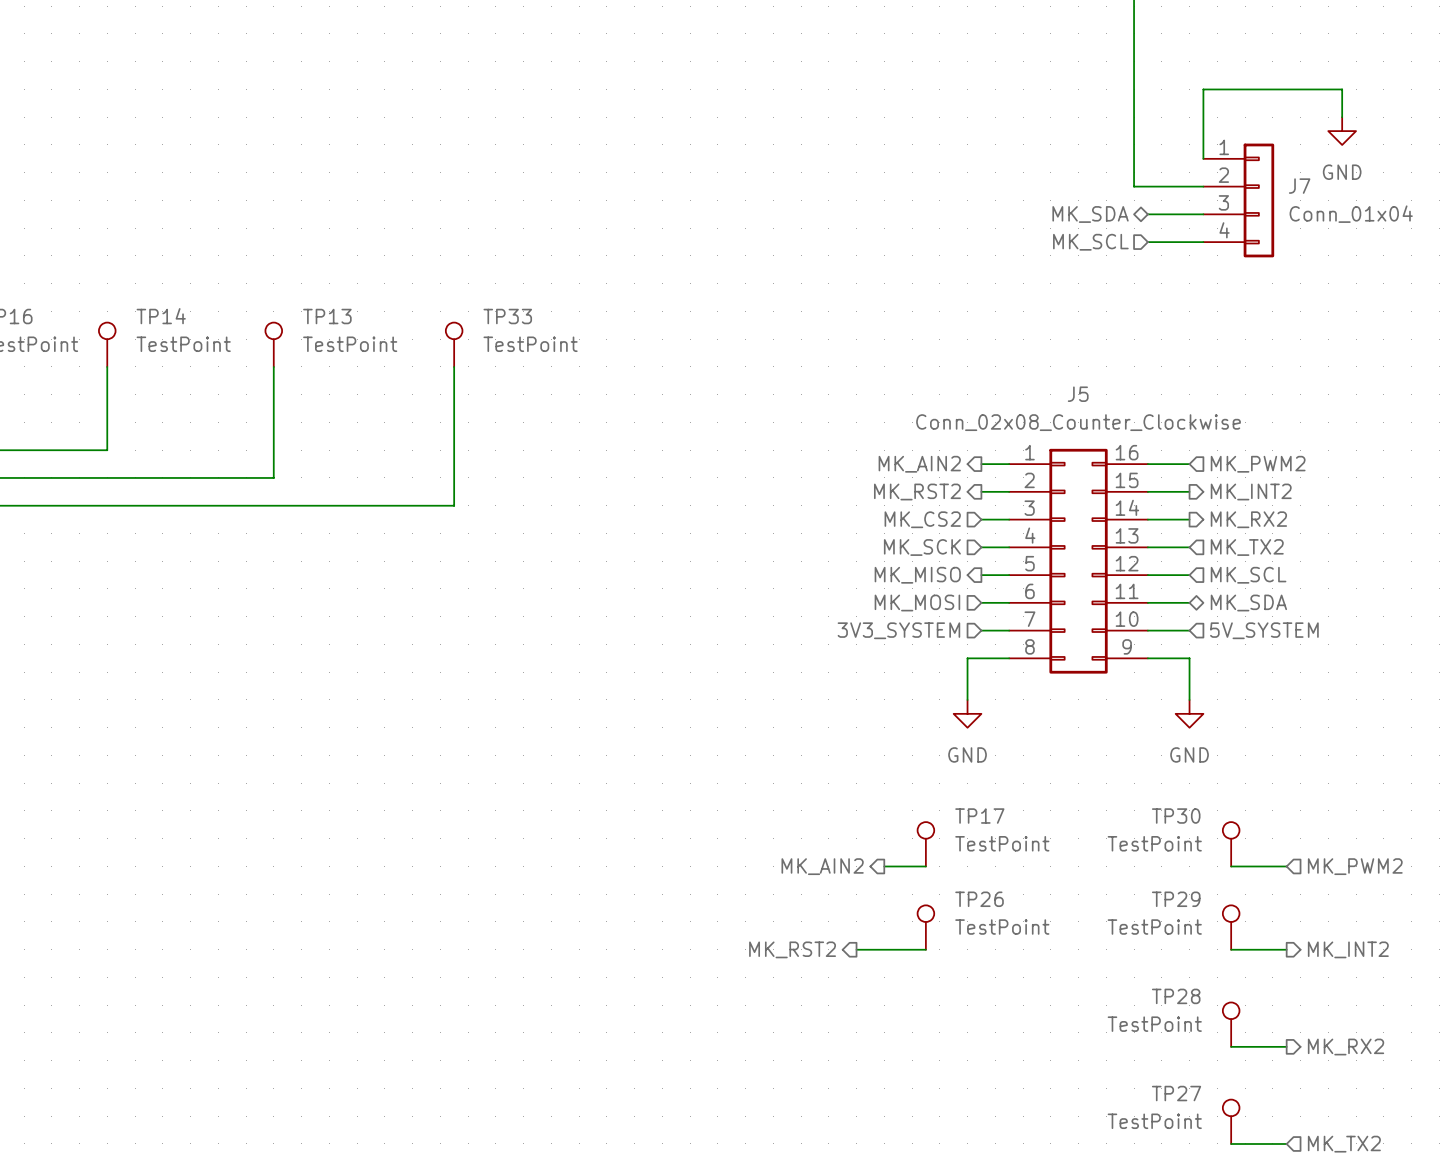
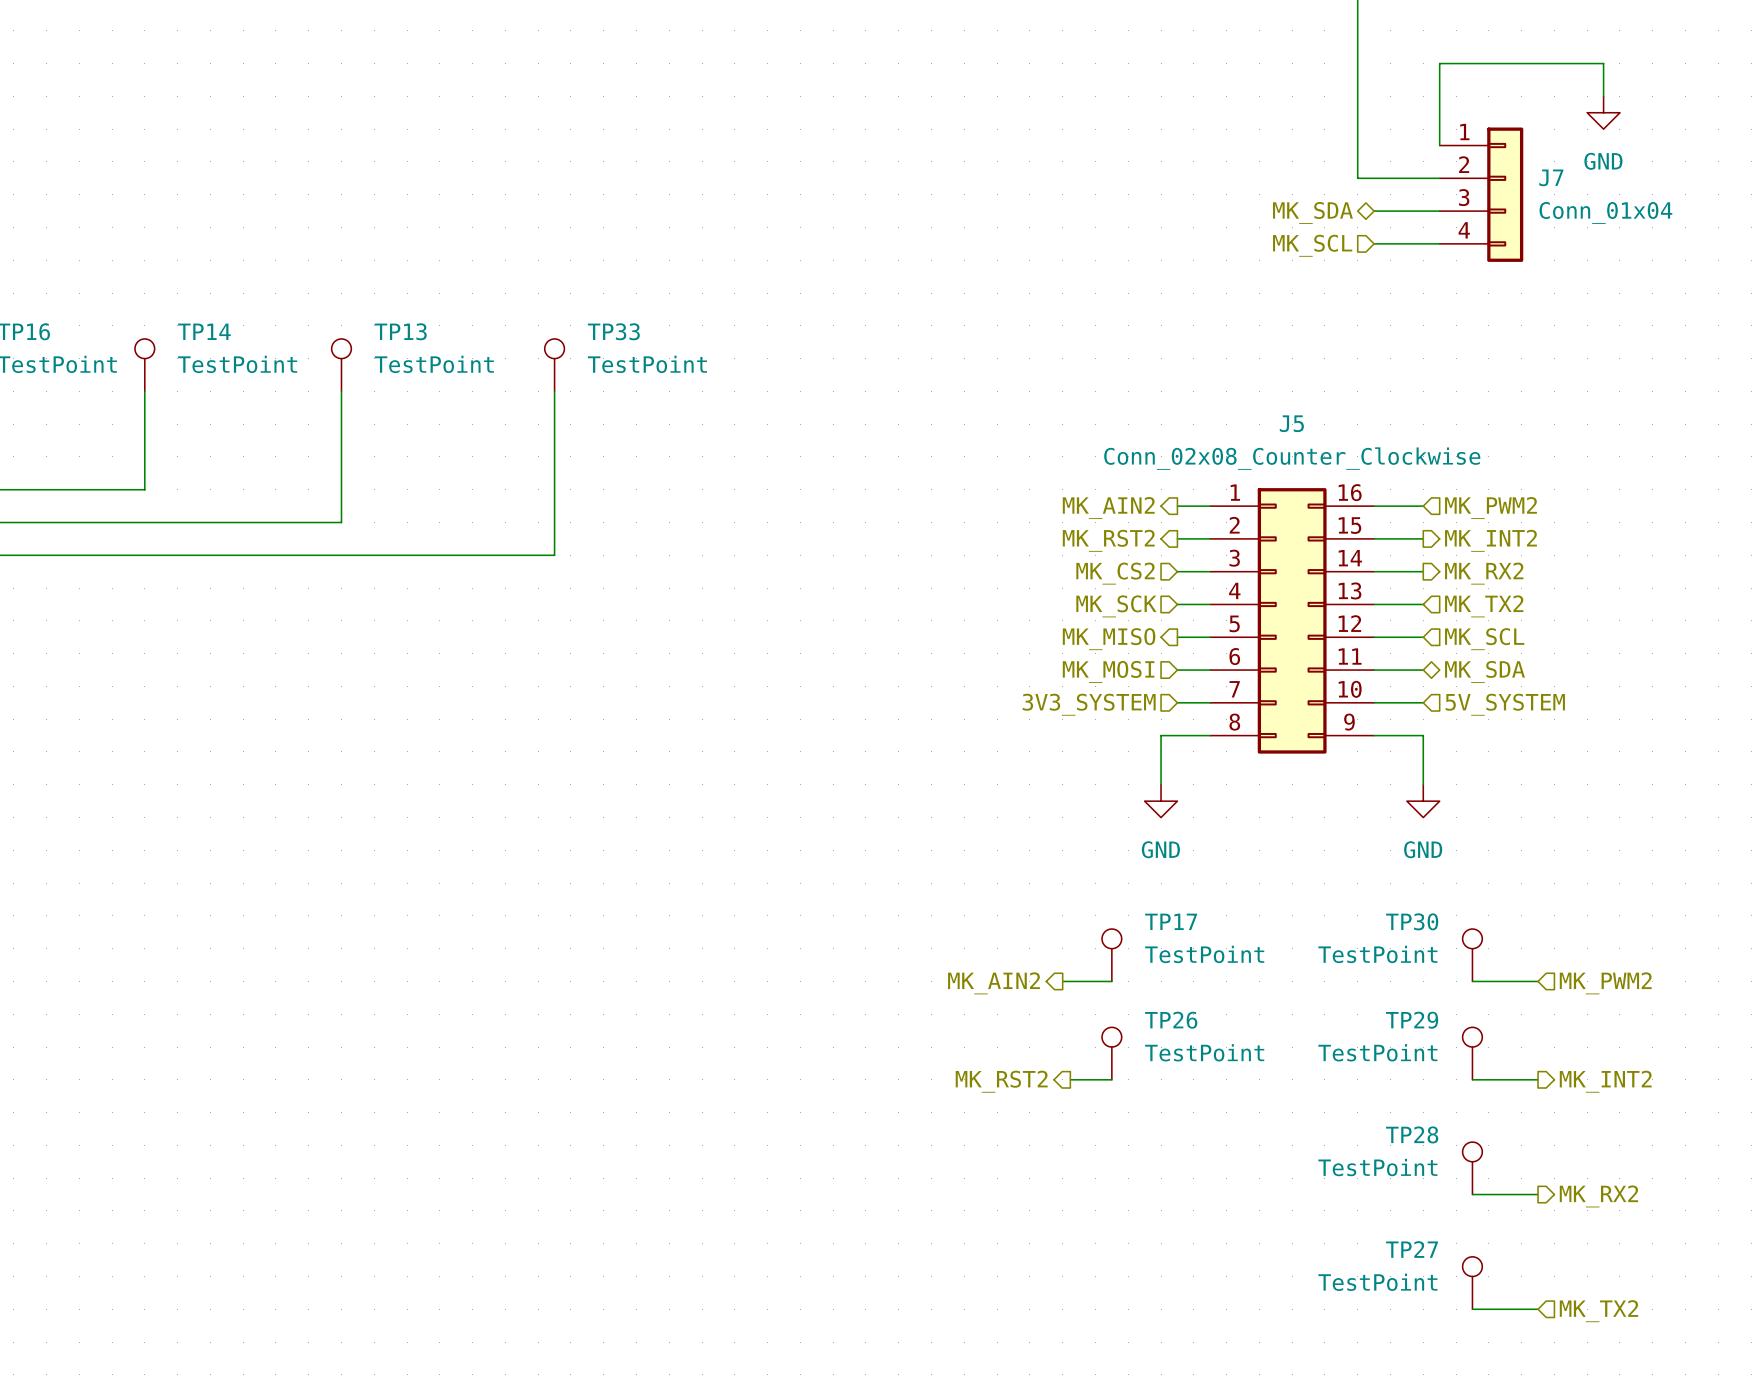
hierarchical label position: MK_RST2 (792, 949) -> MK_RST2 (1001, 1081)
wire: (856, 949) (890, 949) -> none

